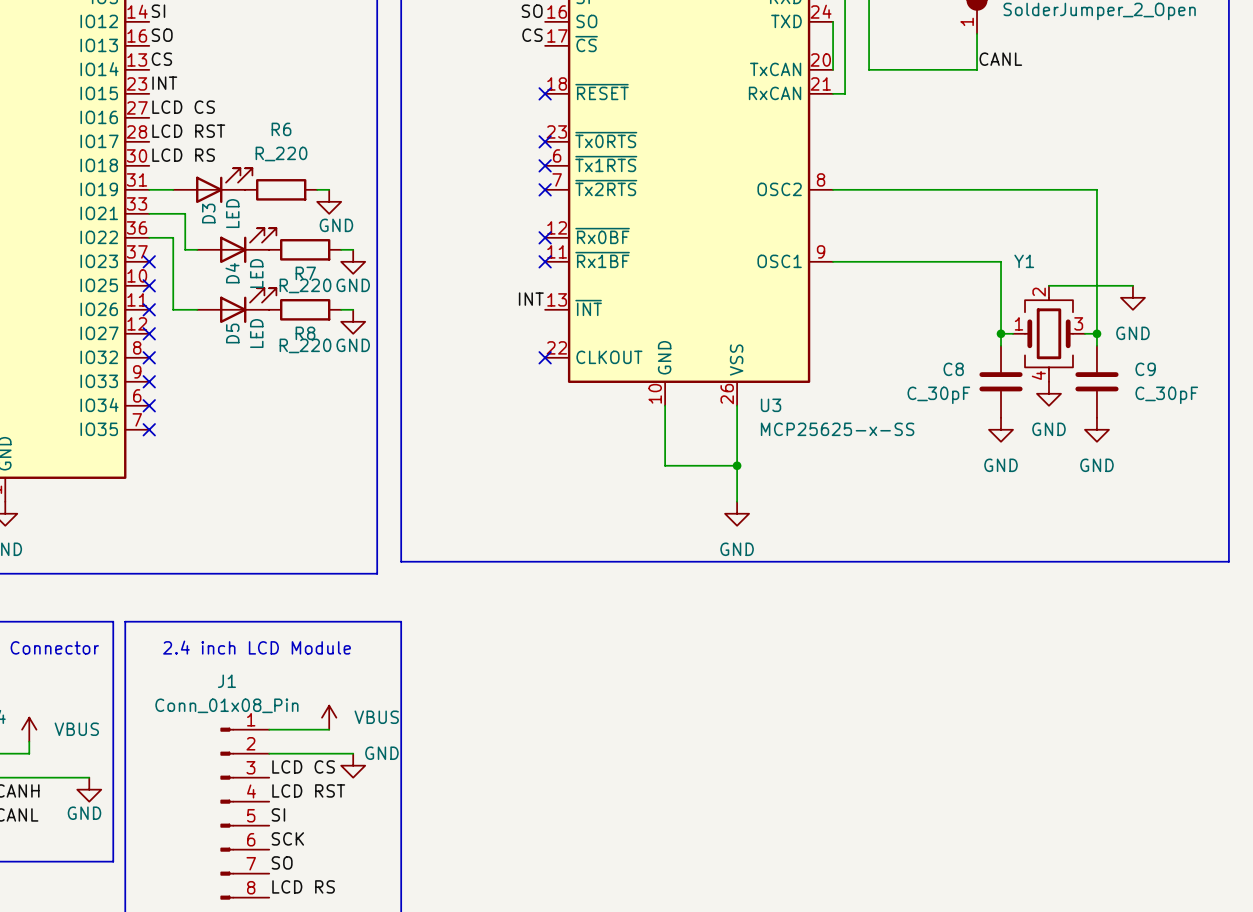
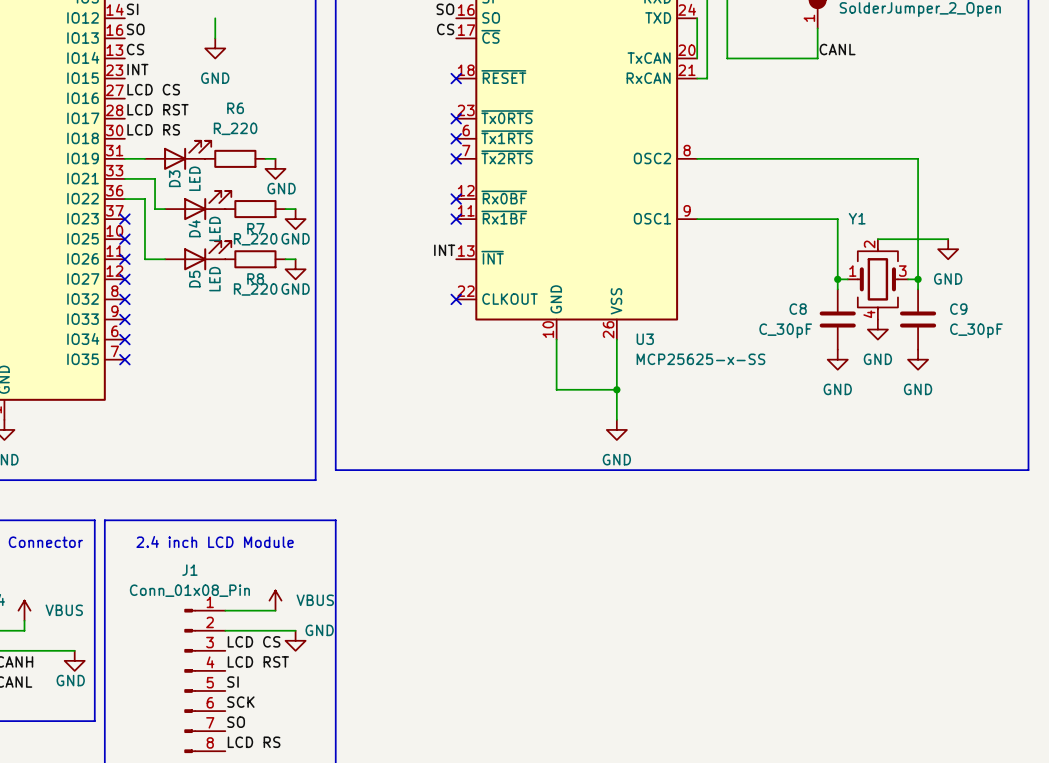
wire: none -> (215, 18) (215, 38)
power symbol: none -> GND (215, 48)

